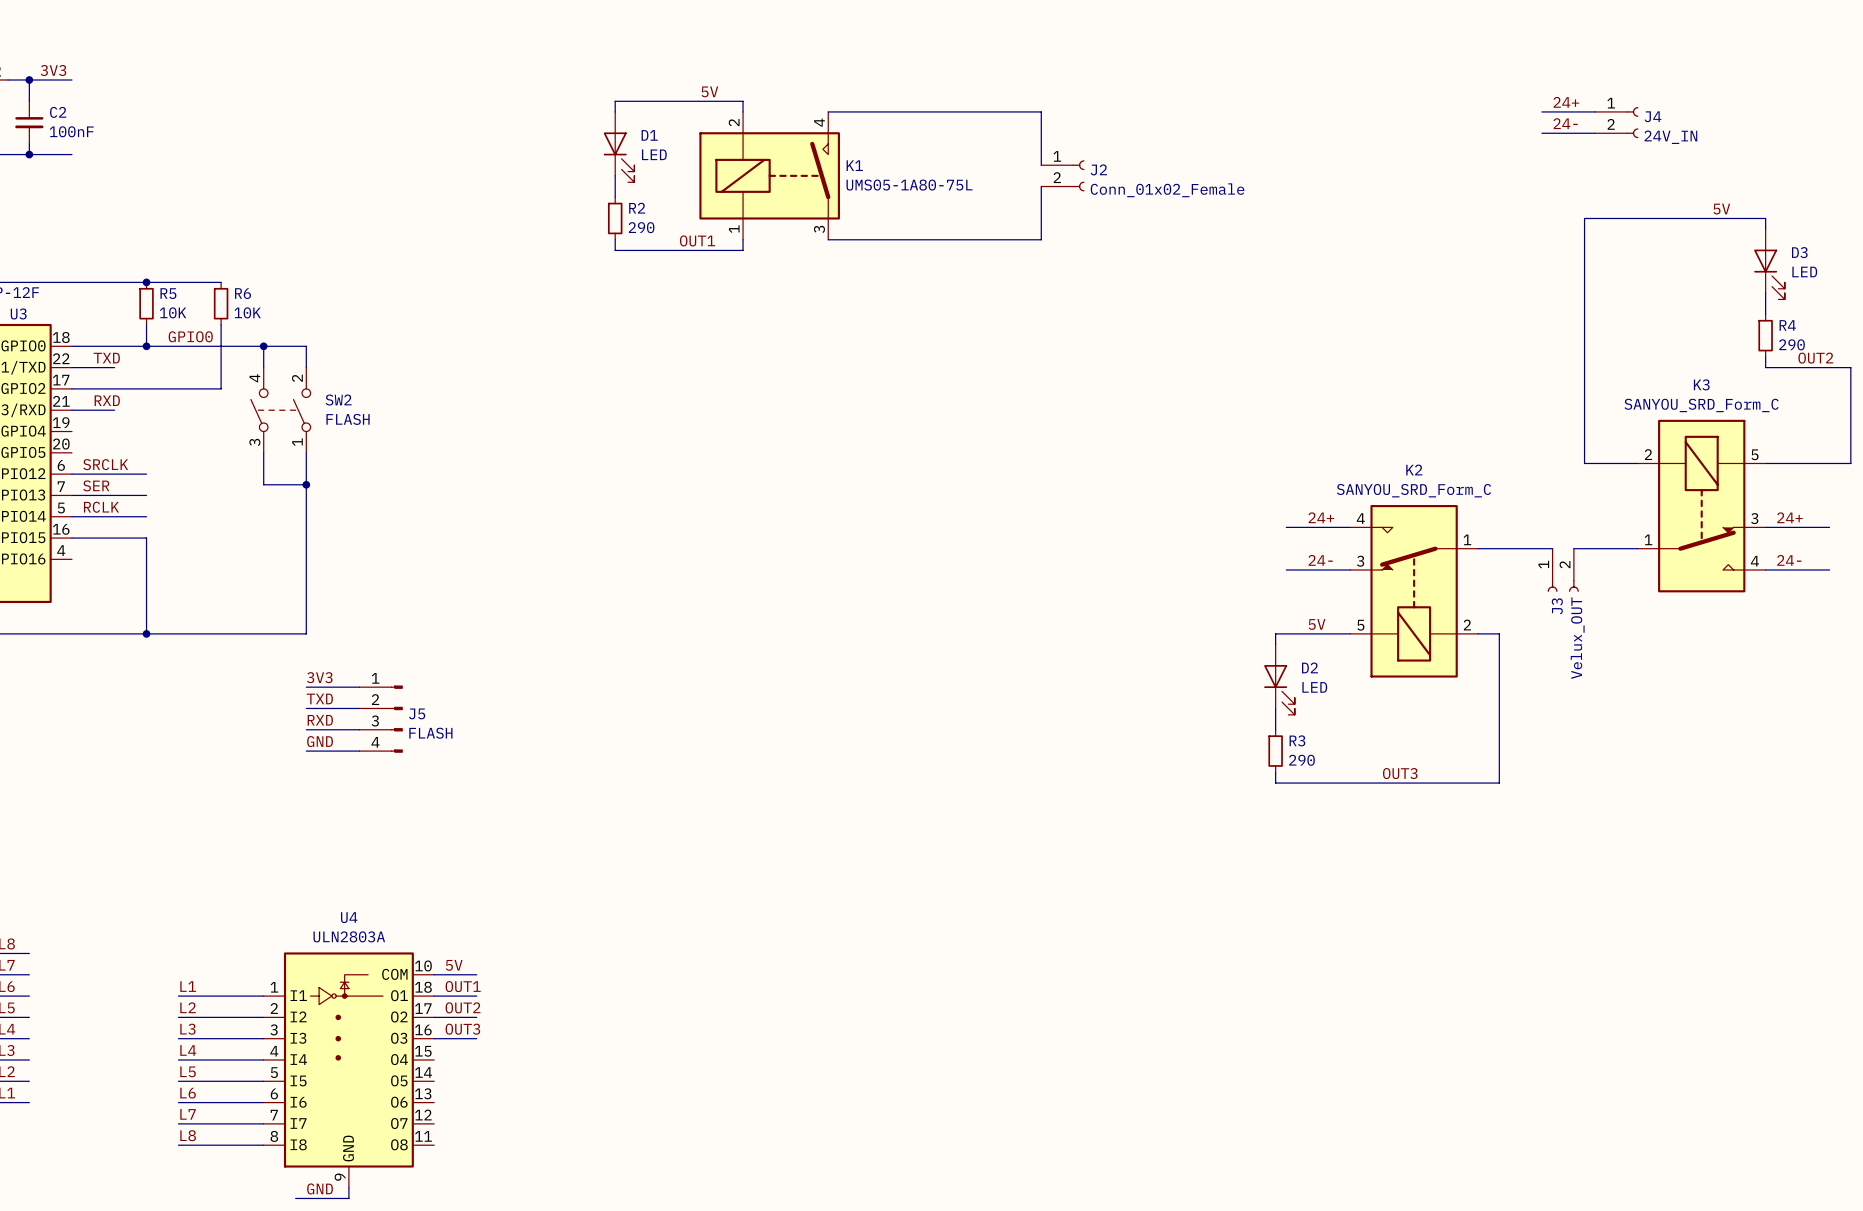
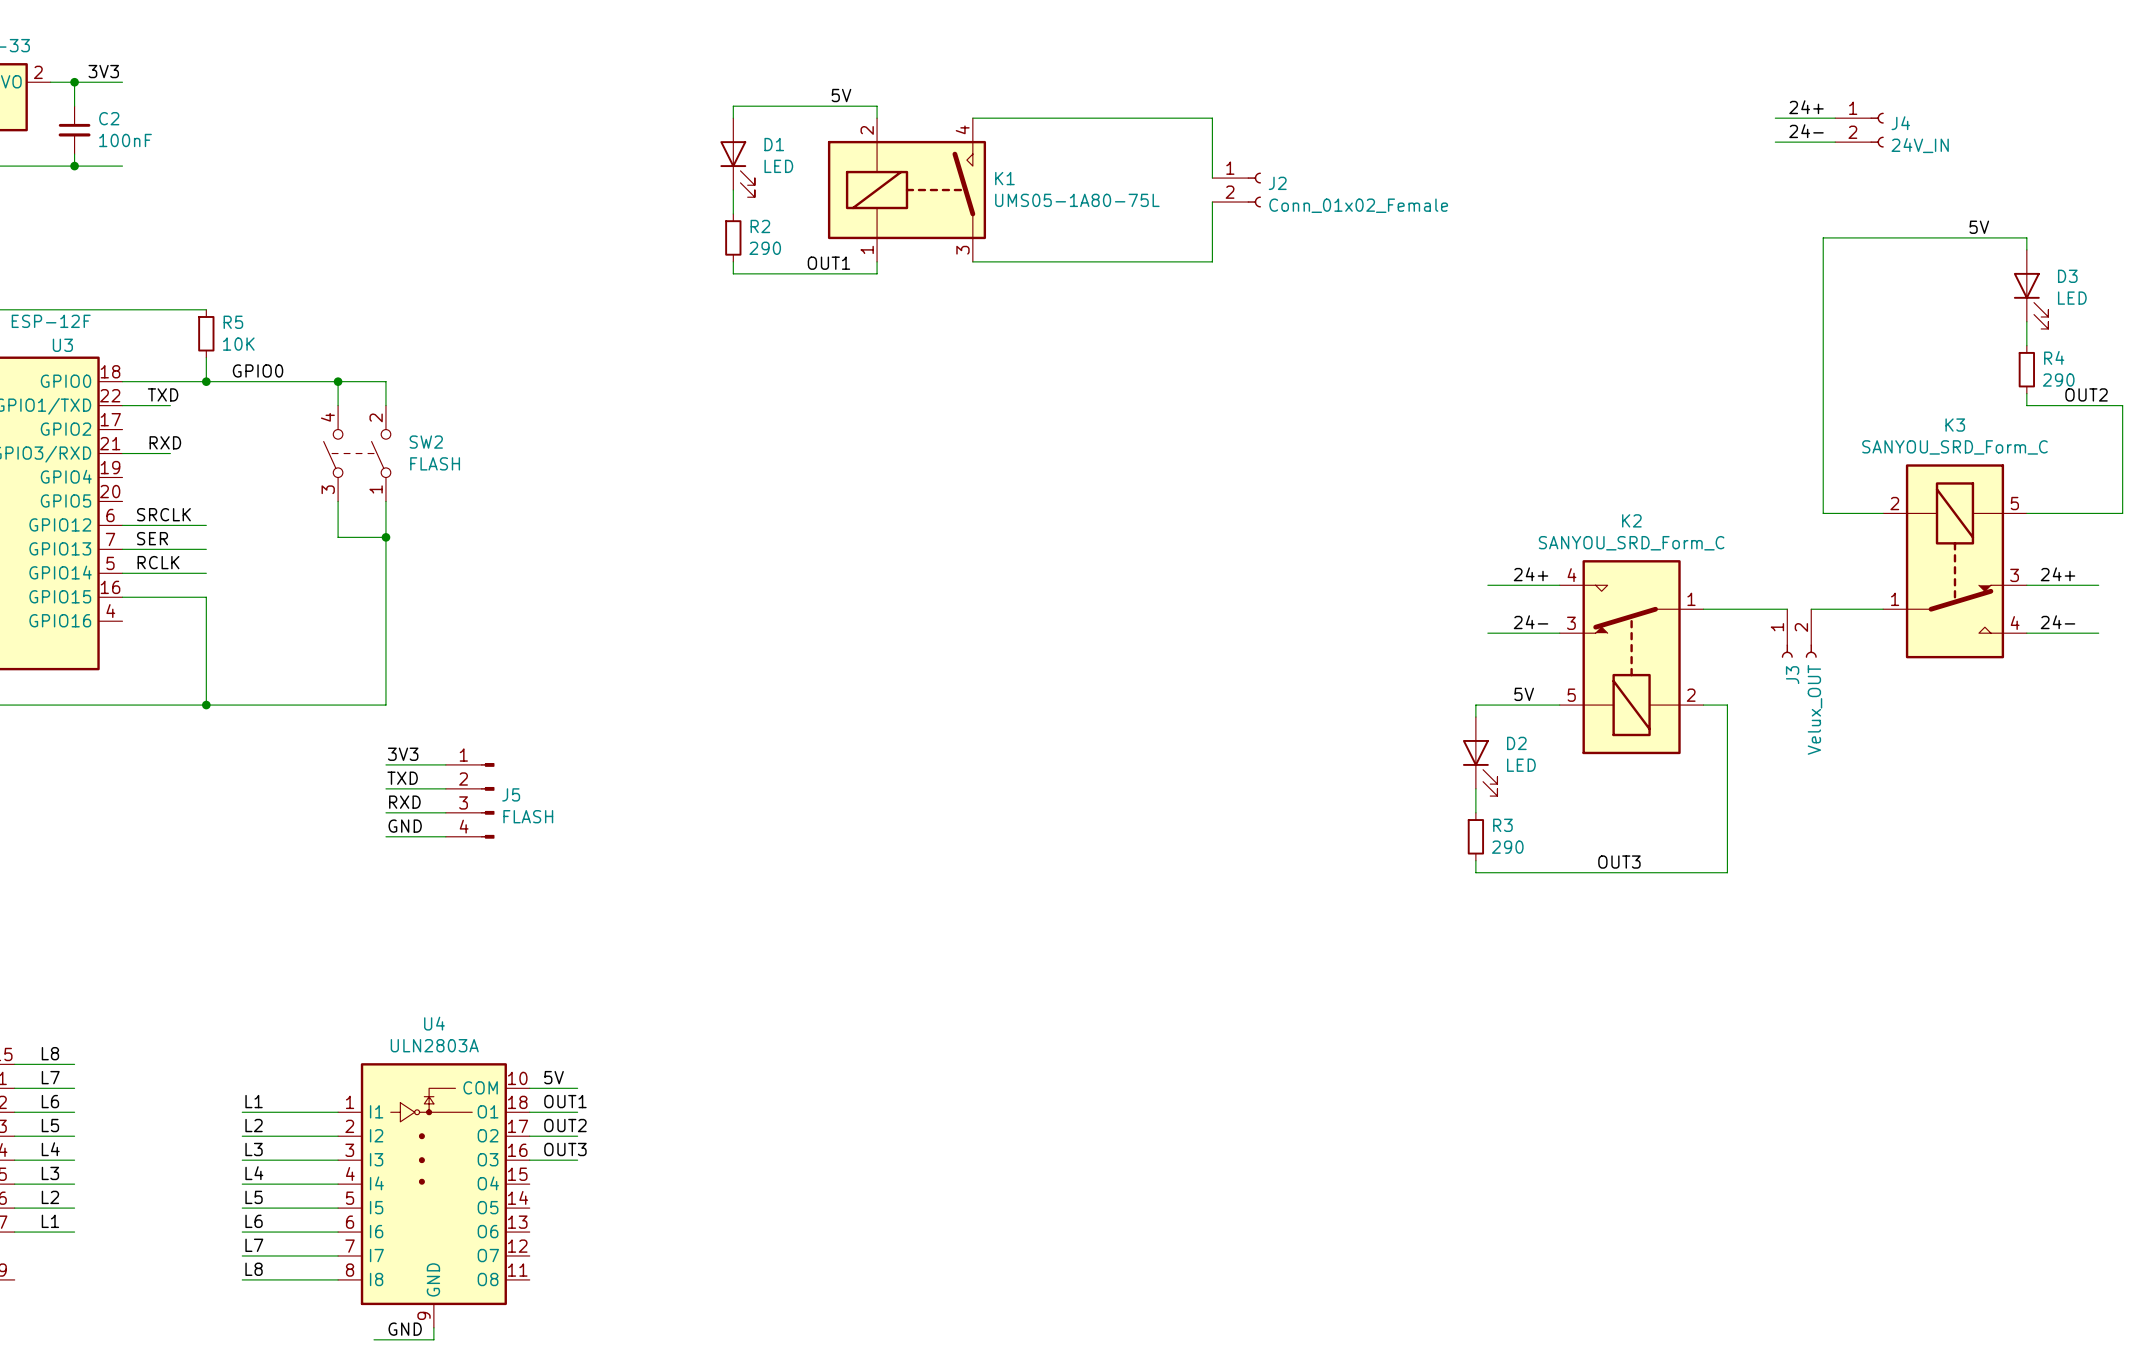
wire: (146, 282) (221, 282) -> none
junction: (146, 282) -> none
R6: 10K (221, 303) -> none
wire: (221, 325) (221, 388) (71, 388) -> none

